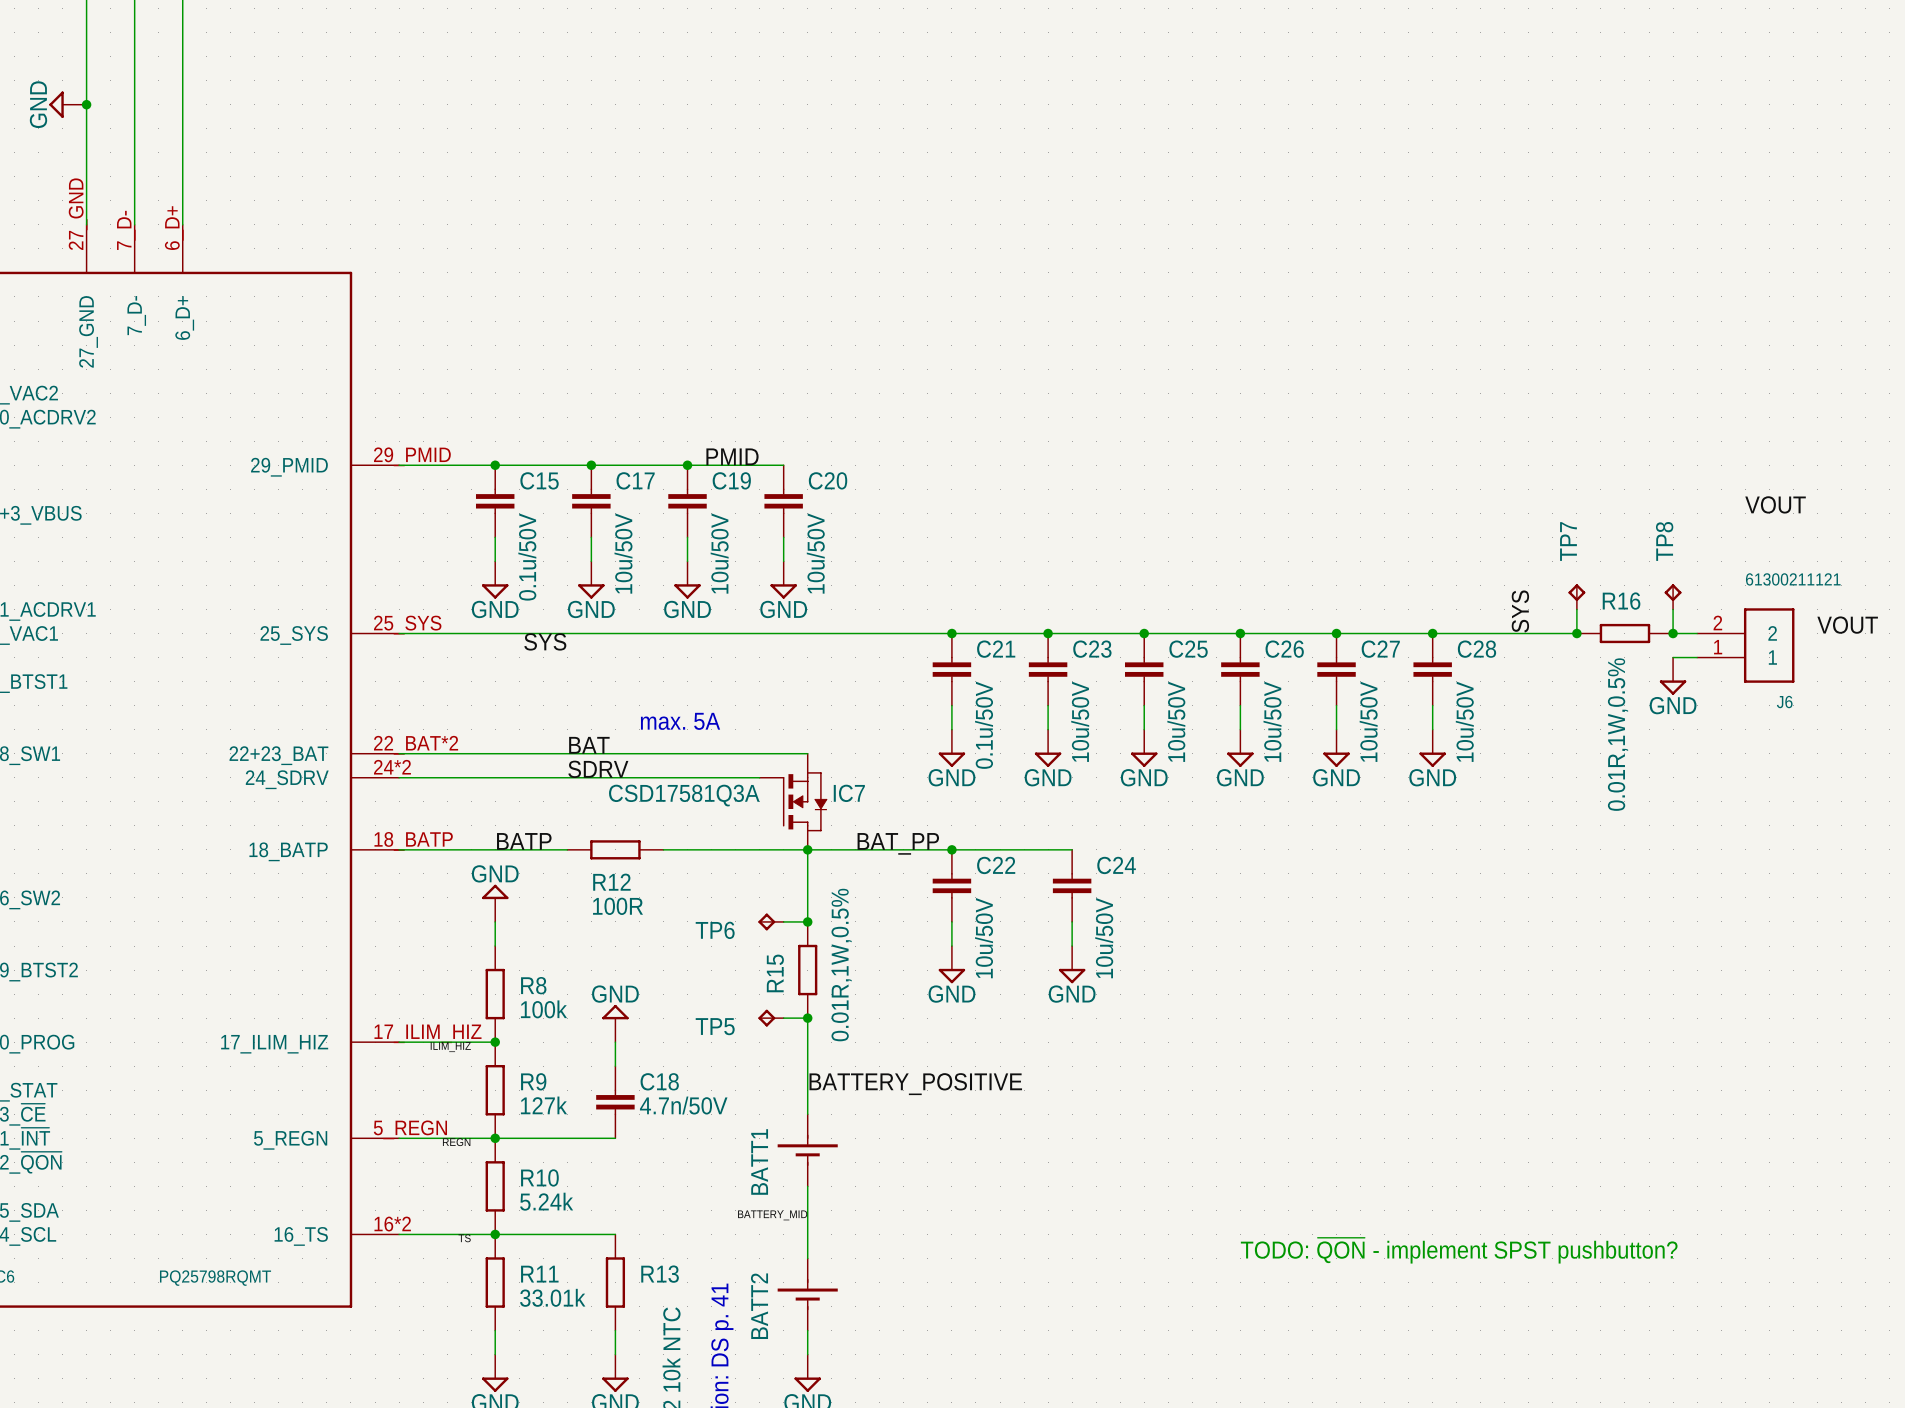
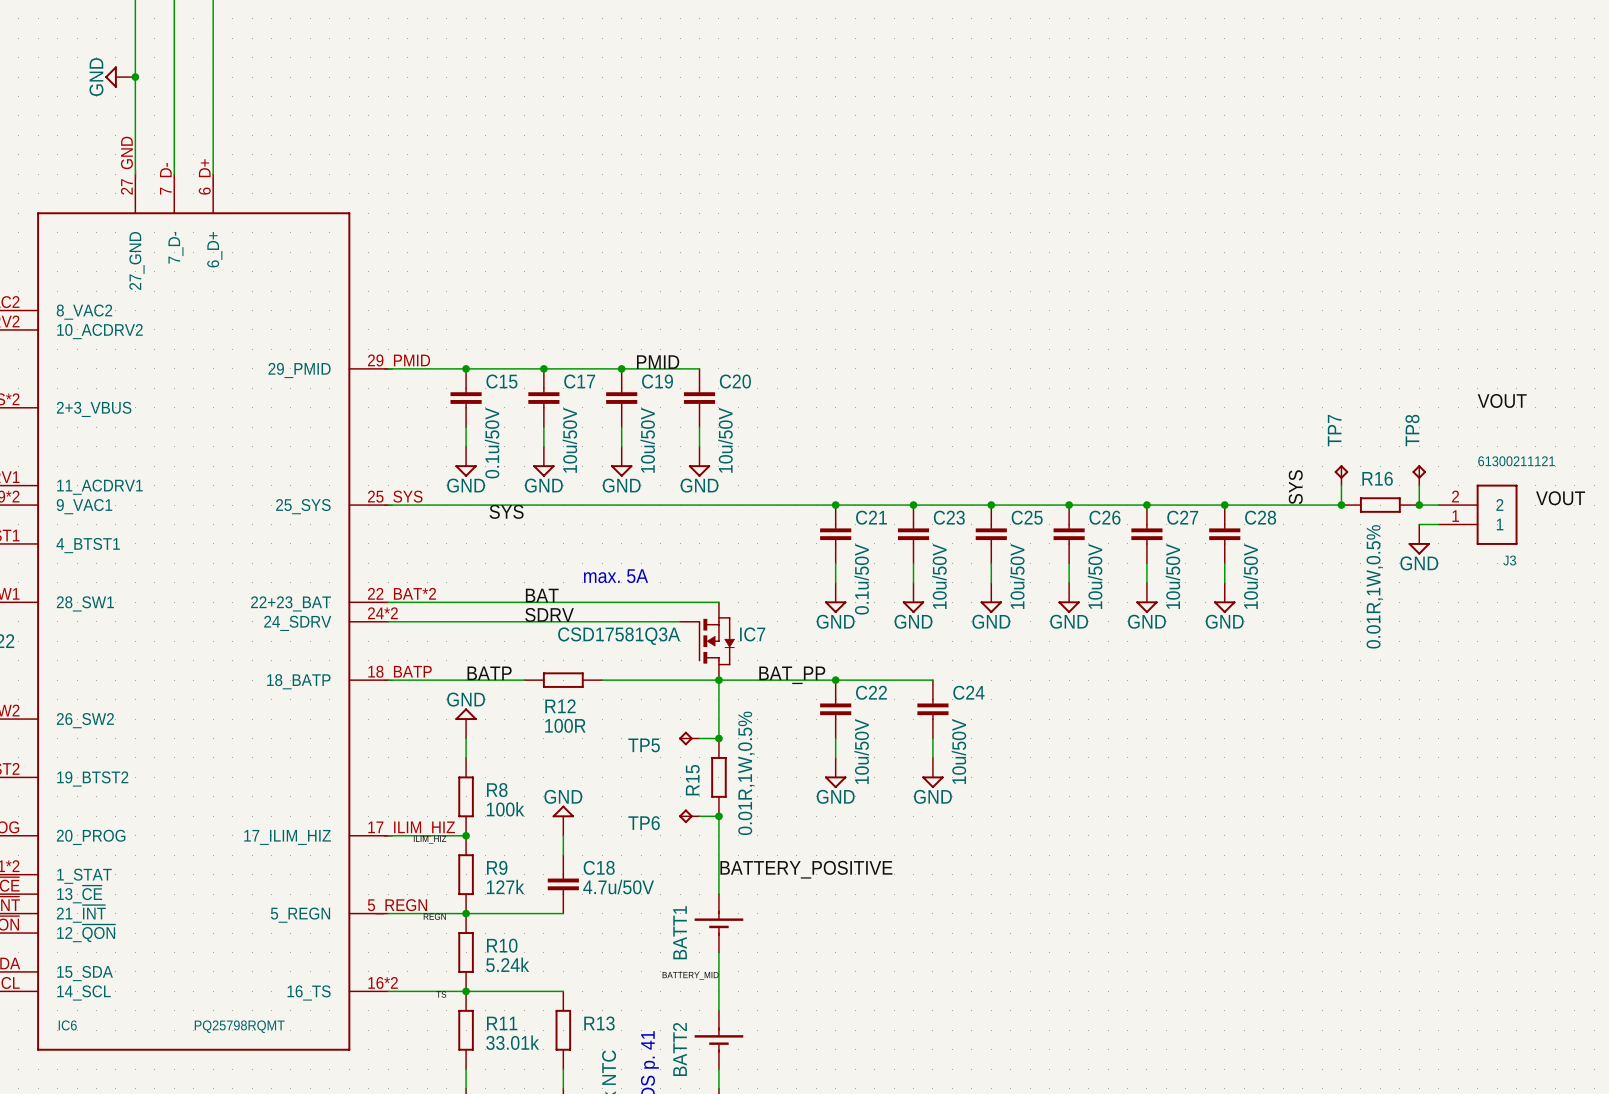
J6 name: J6 (1784, 702) -> J3 (1509, 560)
TP6 name: TP6 (715, 930) -> TP5 (644, 745)
TP5 name: TP5 (715, 1026) -> TP6 (644, 823)
C18 value: 4.7n/50V (683, 1105) -> 4.7u/50V (618, 887)
text: TODO: ~{QON} - implement SPST pushbutton? (1459, 1250) -> none

